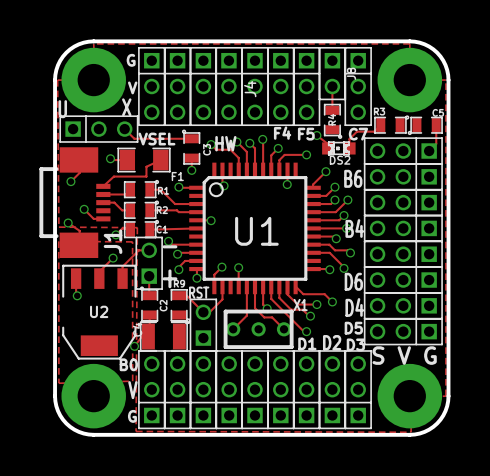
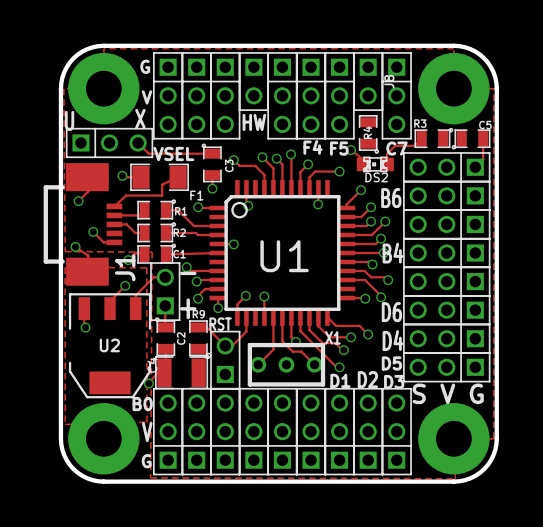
part: none -> (253, 81)
J4: (228, 86) -> none
track: (332, 86) (332, 110) -> none
text position: HW (225, 143) -> HW (254, 122)

